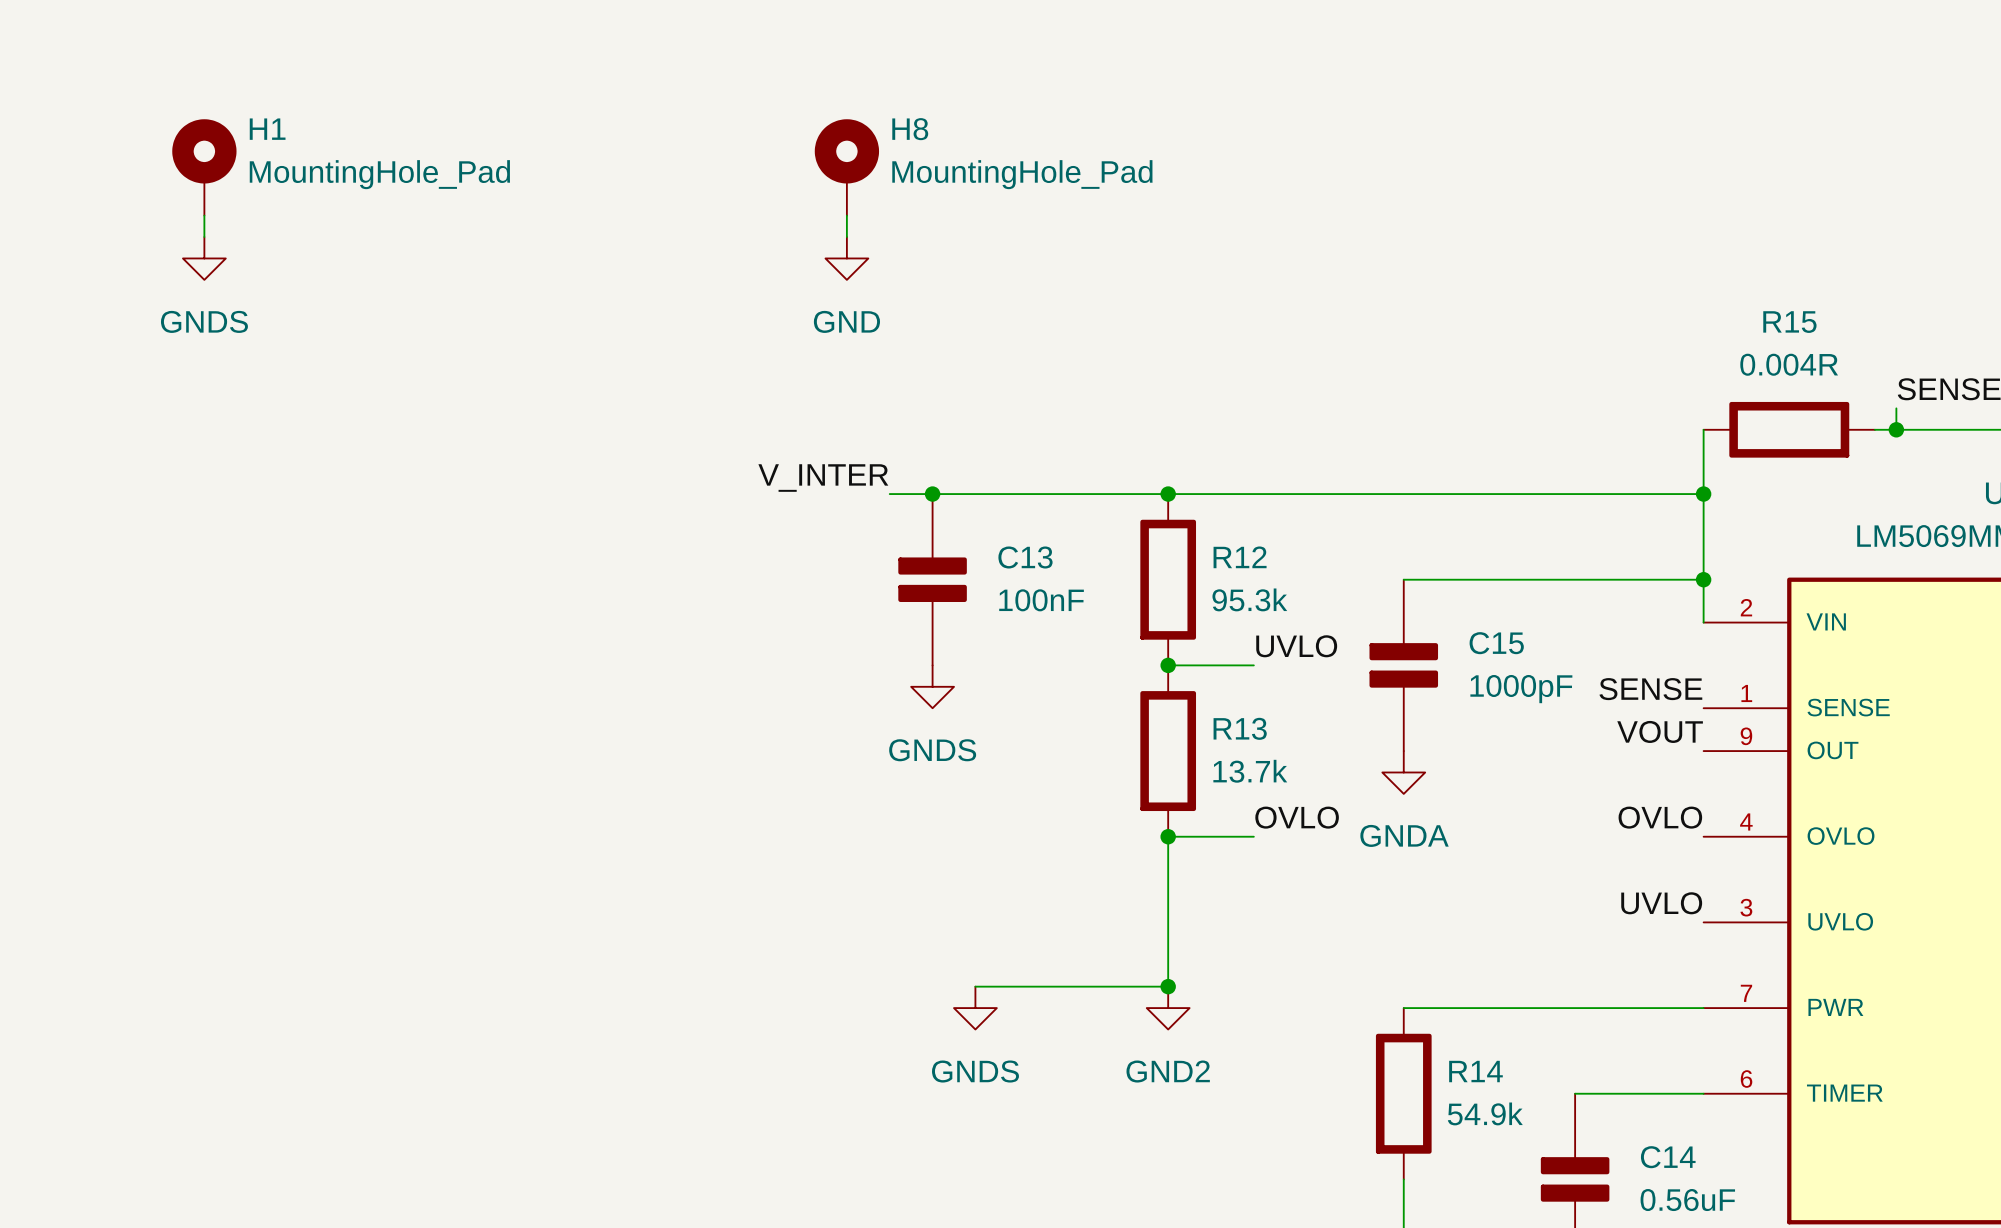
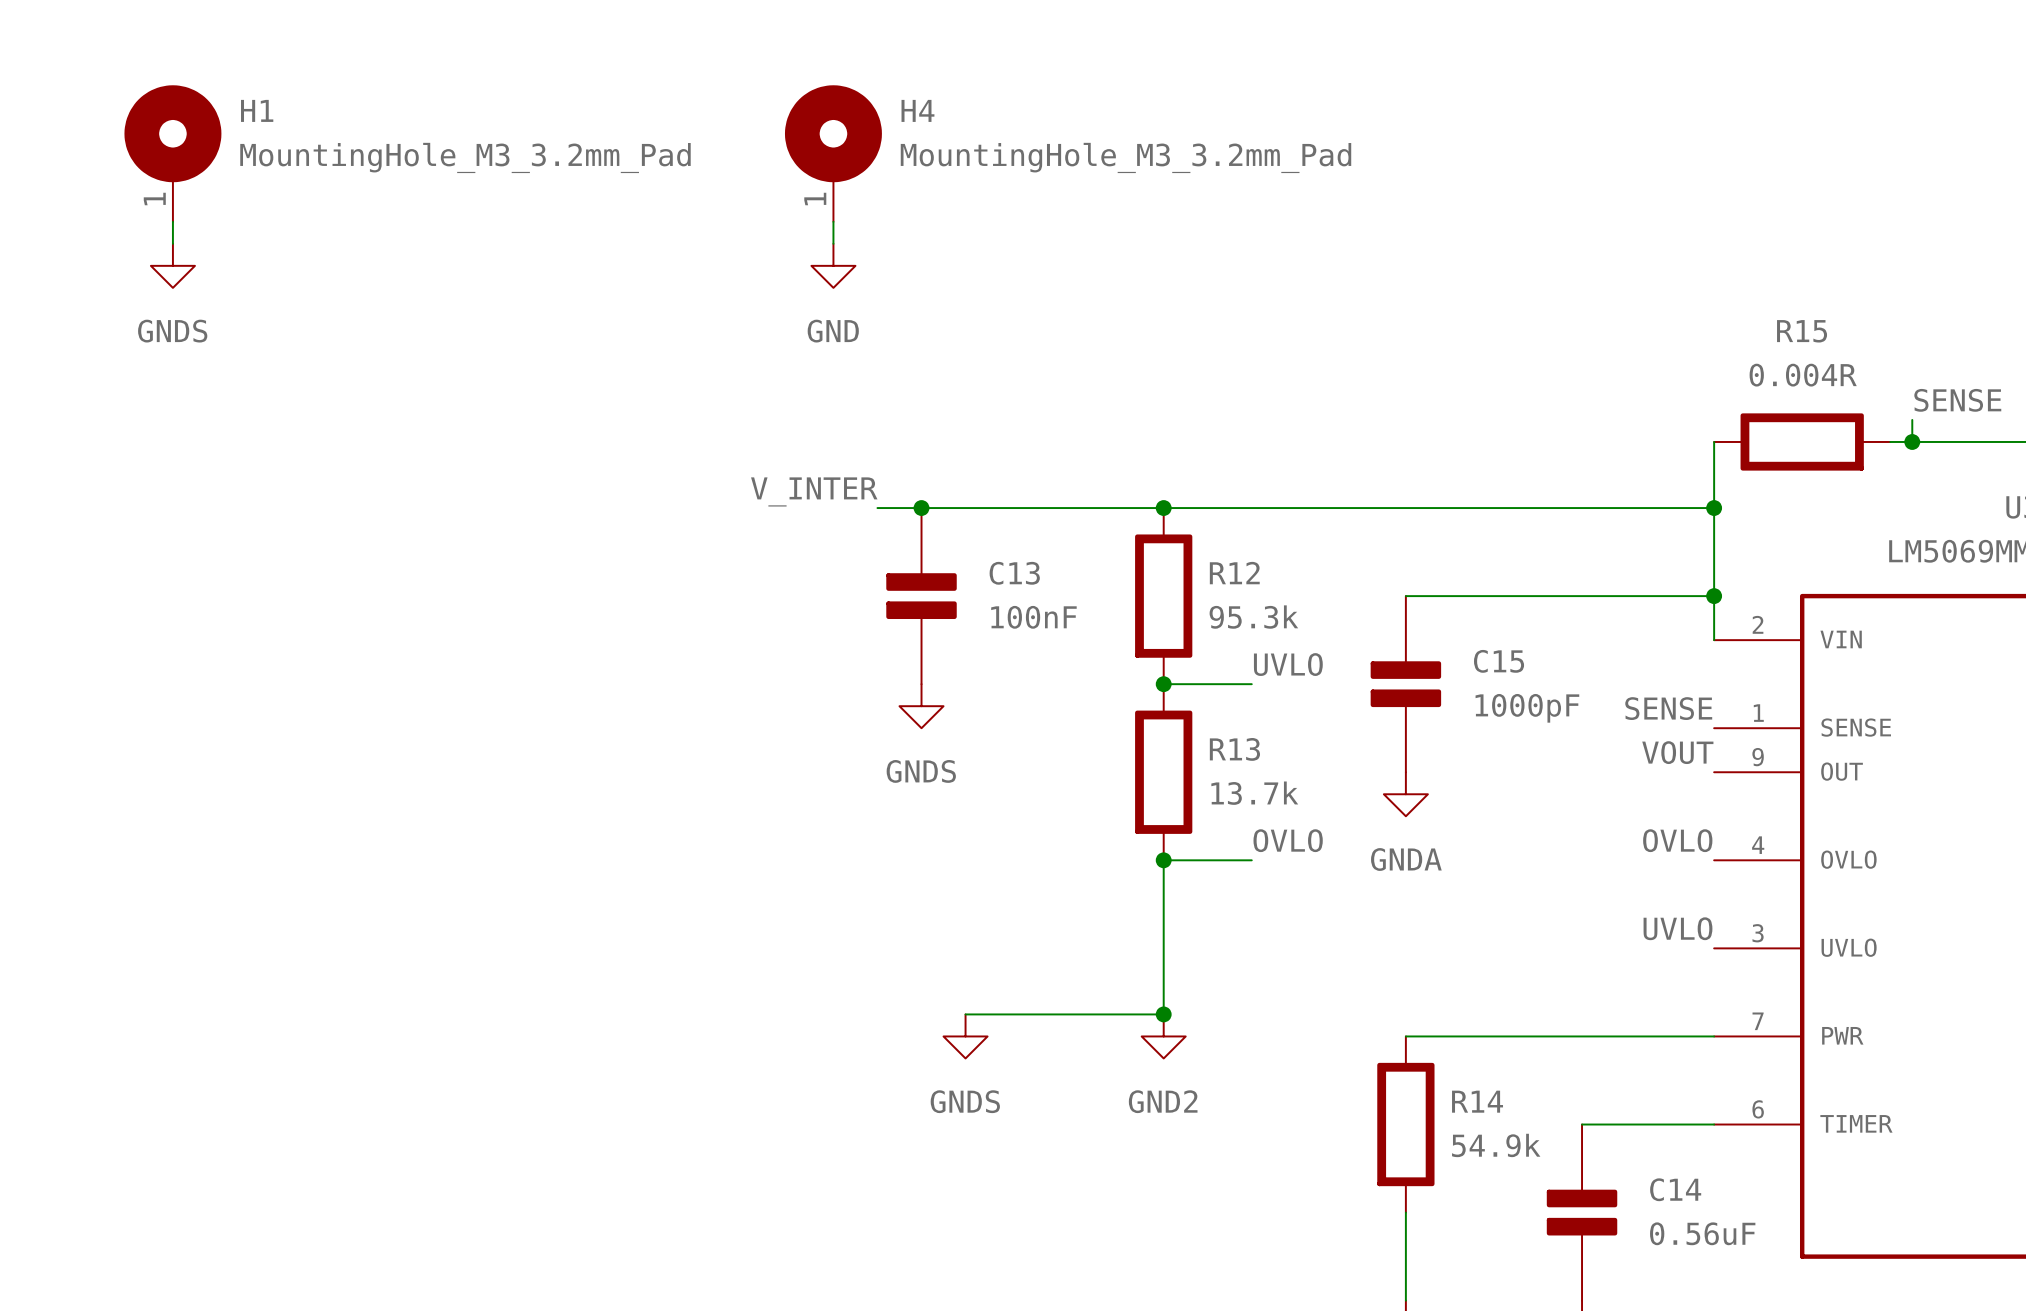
H1 symbol: [172, 119, 237, 216] -> [124, 85, 222, 222]
H4: none -> MountingHole_M3_3.2mm_Pad (833, 153)
H8: MountingHole_Pad (846, 167) -> none
H1 value: MountingHole_Pad (379, 174) -> MountingHole_M3_3.2mm_Pad (465, 157)

